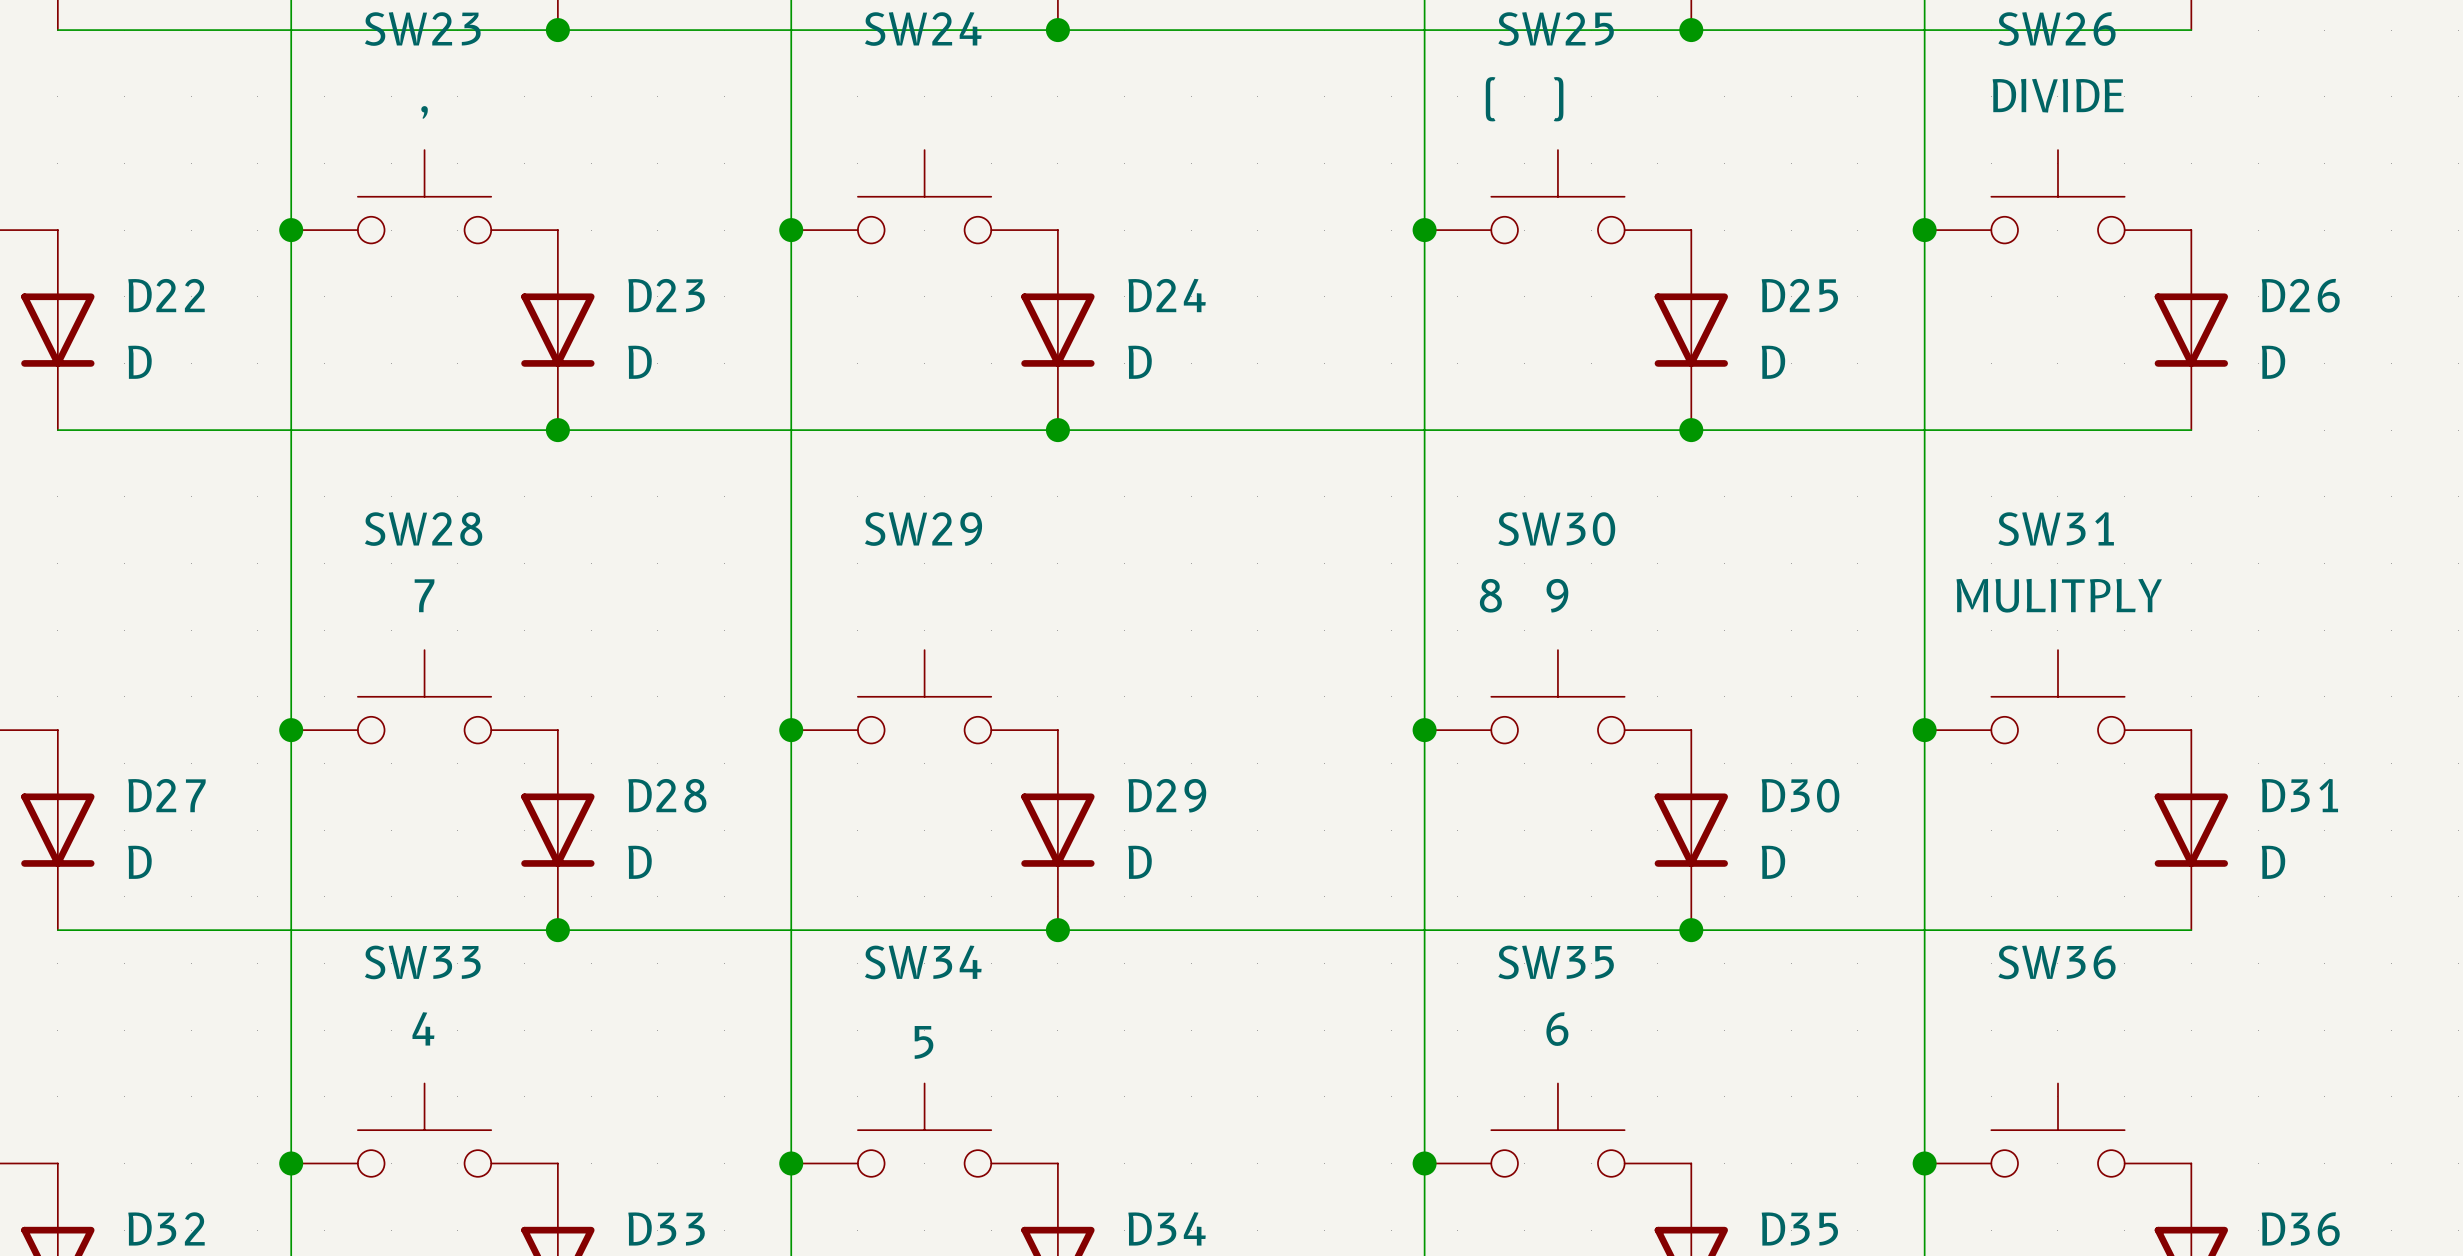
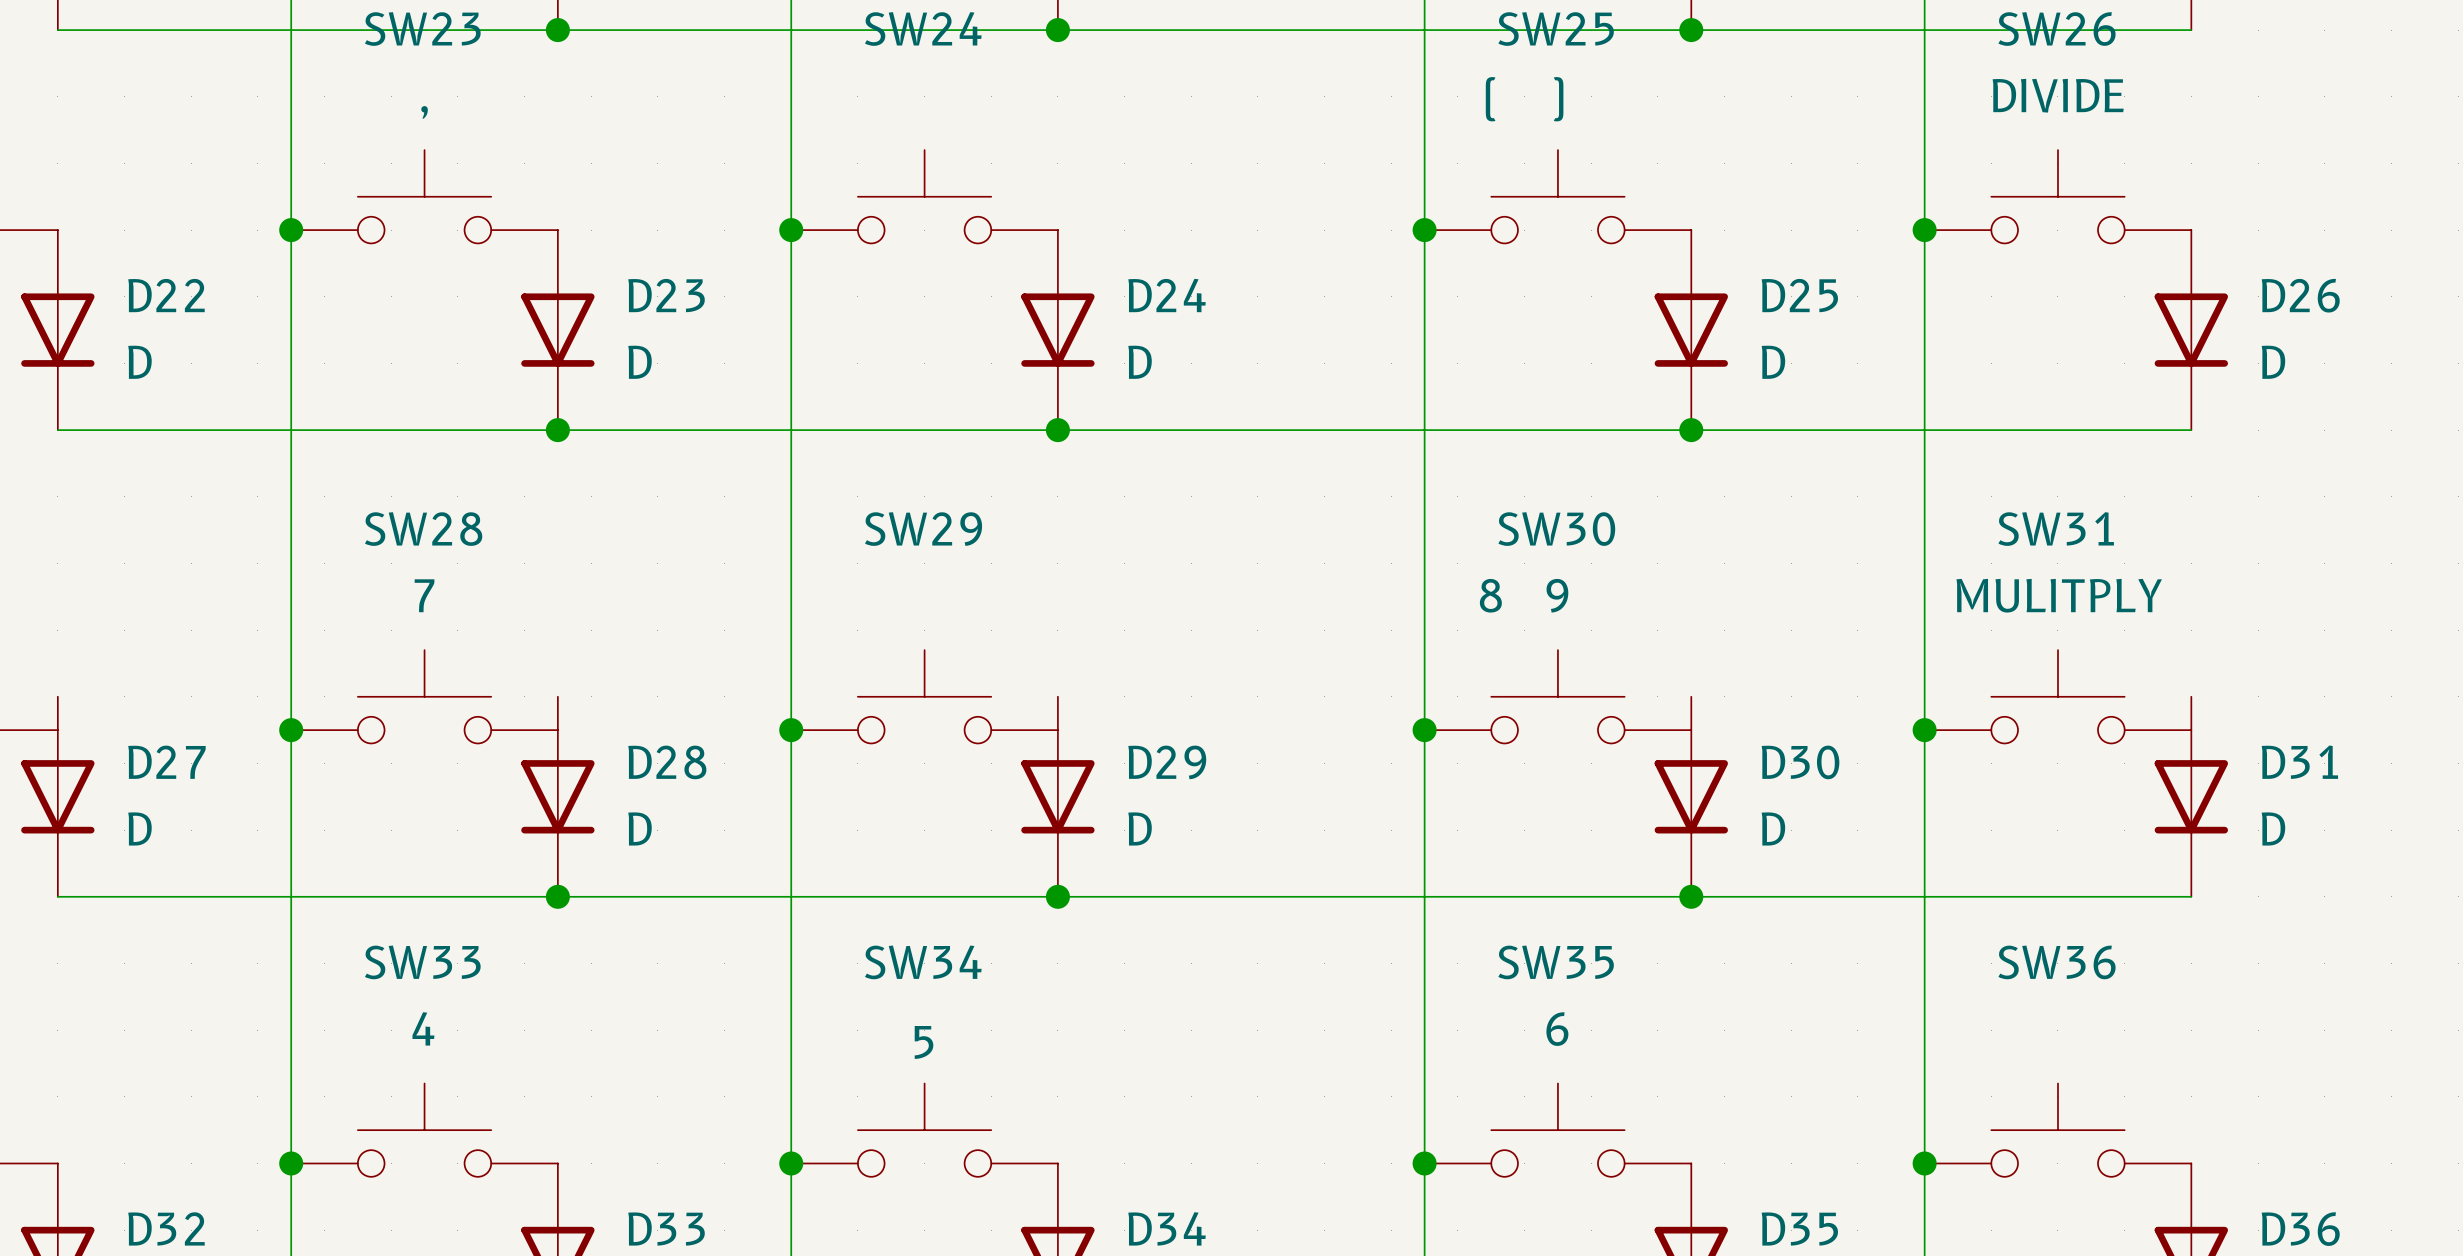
D27 position: (57, 830) -> (57, 796)
D28 position: (557, 830) -> (557, 796)
D29 position: (1057, 830) -> (1057, 796)
D30 position: (1691, 830) -> (1691, 796)
D31 position: (2191, 830) -> (2191, 796)
wire: (57, 930) (2191, 930) -> (57, 896) (2191, 896)
junction position: (557, 930) -> (557, 896)
junction position: (1057, 930) -> (1057, 896)
junction position: (1691, 930) -> (1691, 896)

